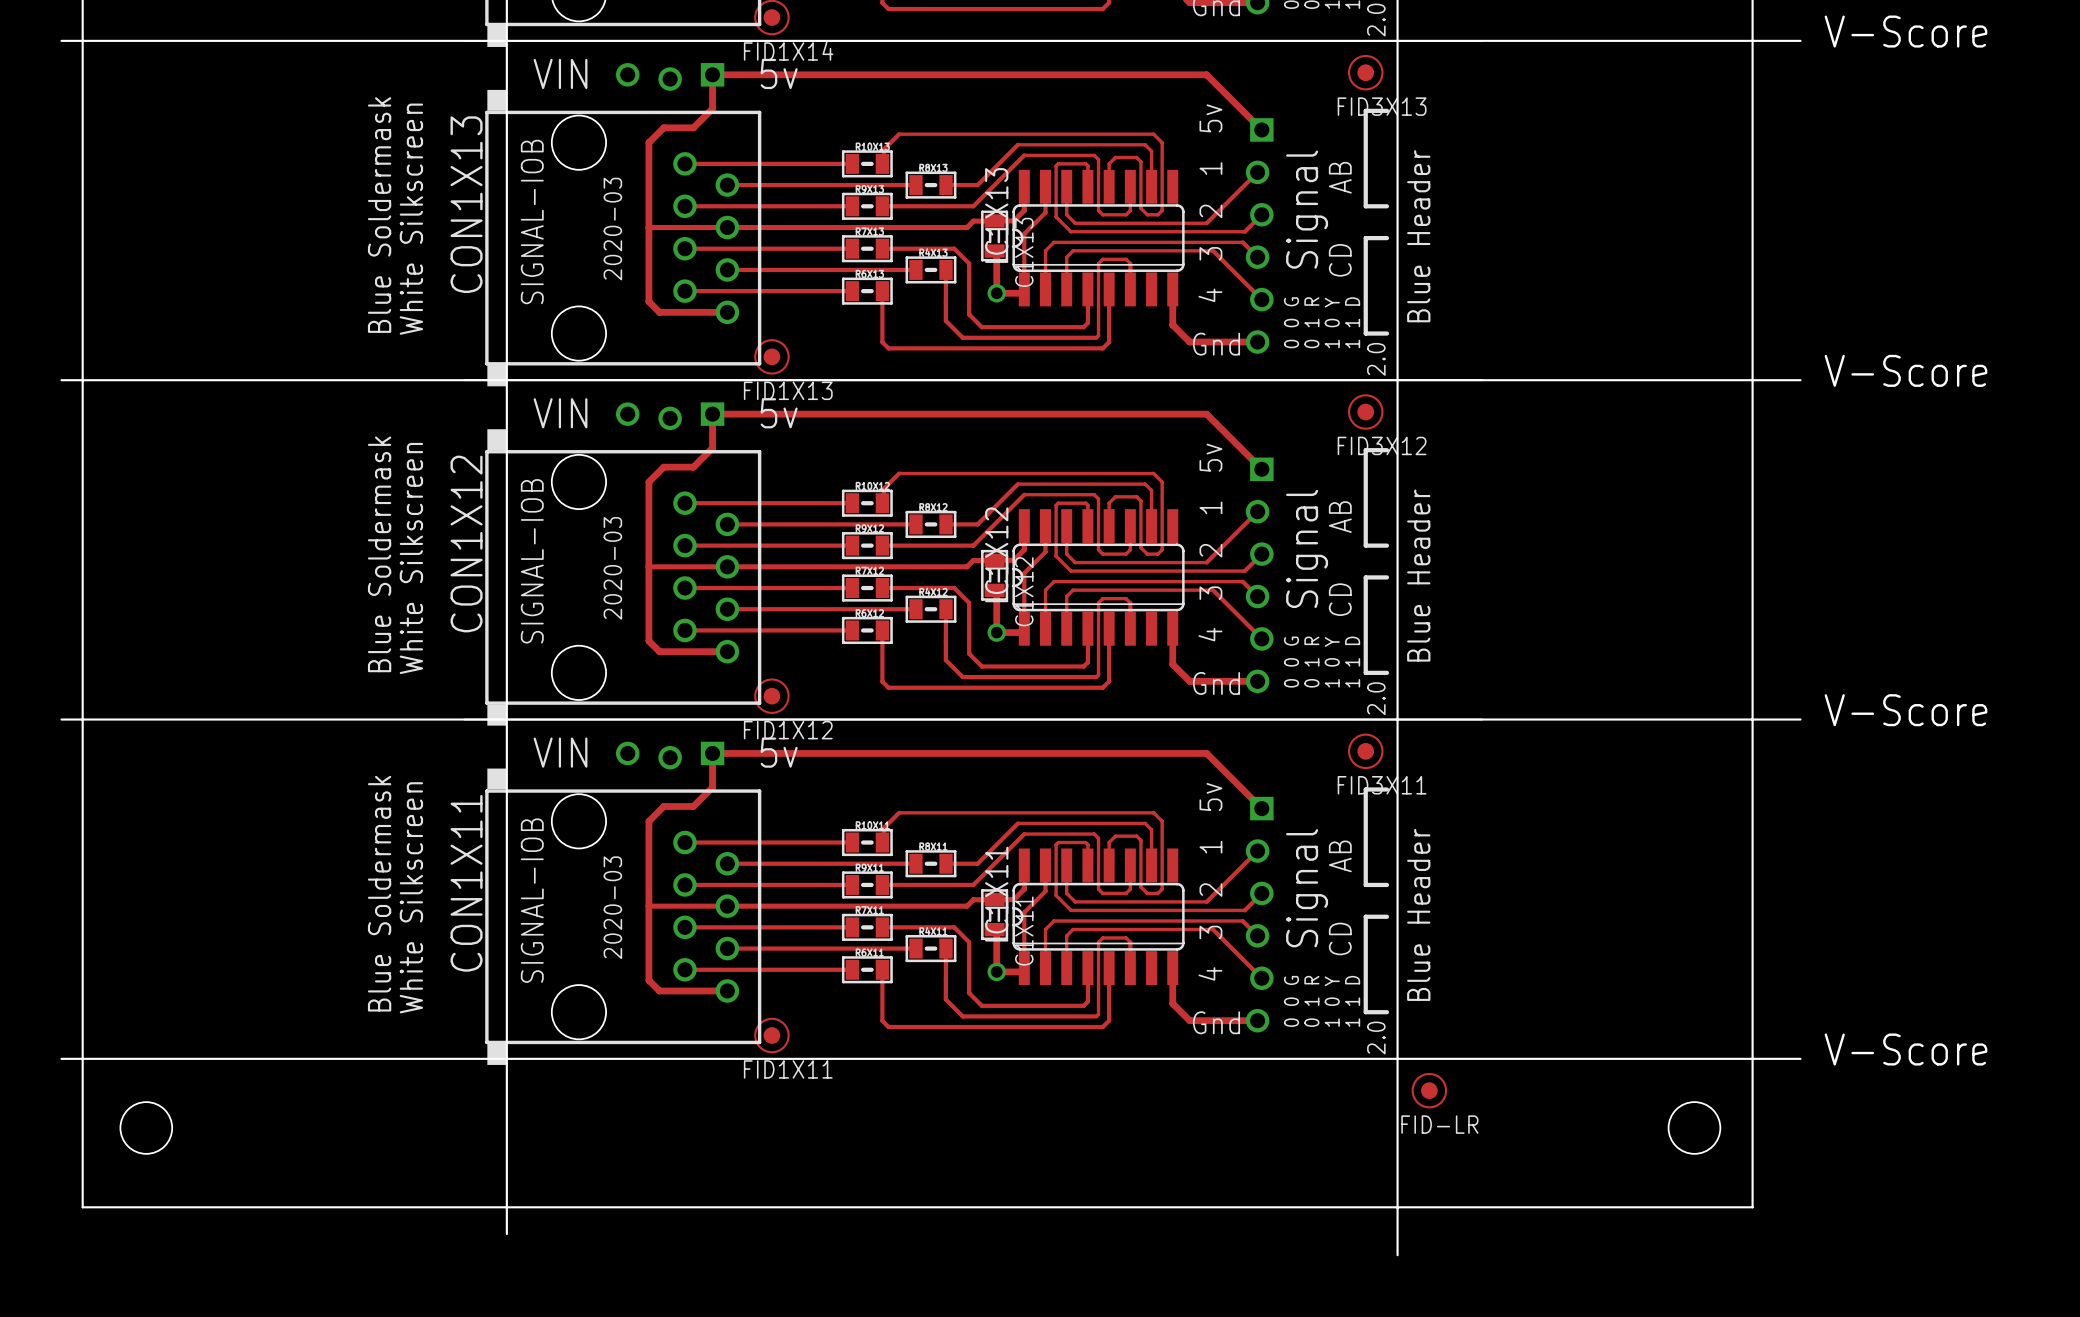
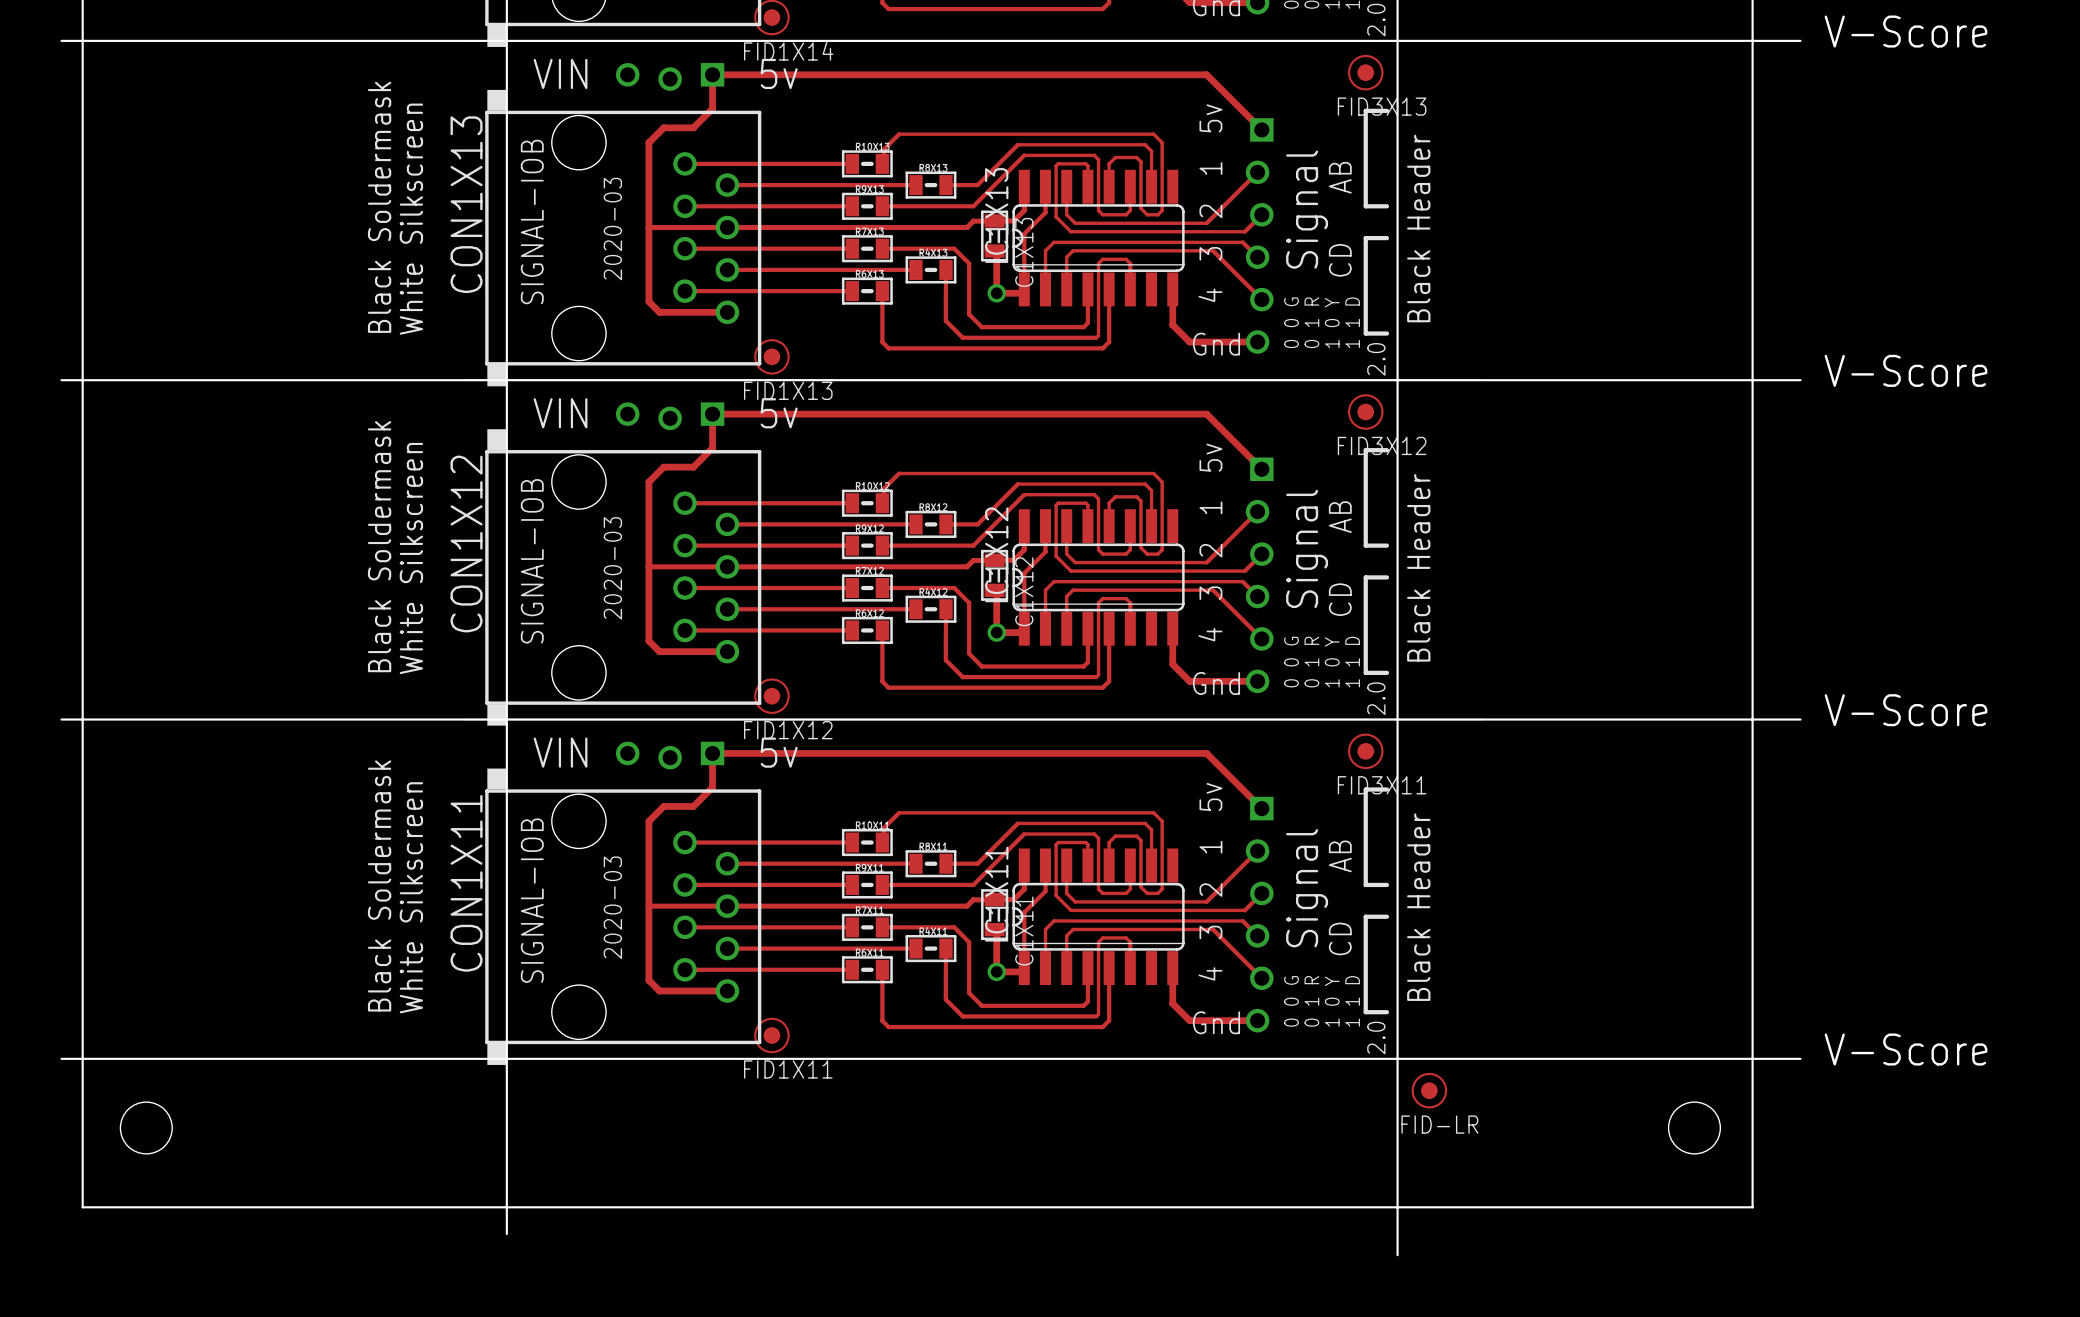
text: Blue Soldermask (379, 215) -> Black Soldermask (379, 207)
text: Blue Header (1418, 236) -> Black Header (1418, 228)
text: Blue Soldermask (379, 554) -> Black Soldermask (379, 546)
text: Blue Header (1418, 575) -> Black Header (1418, 567)
text: Blue Soldermask (379, 893) -> Black Soldermask (379, 885)
text: Blue Header (1418, 914) -> Black Header (1418, 907)

